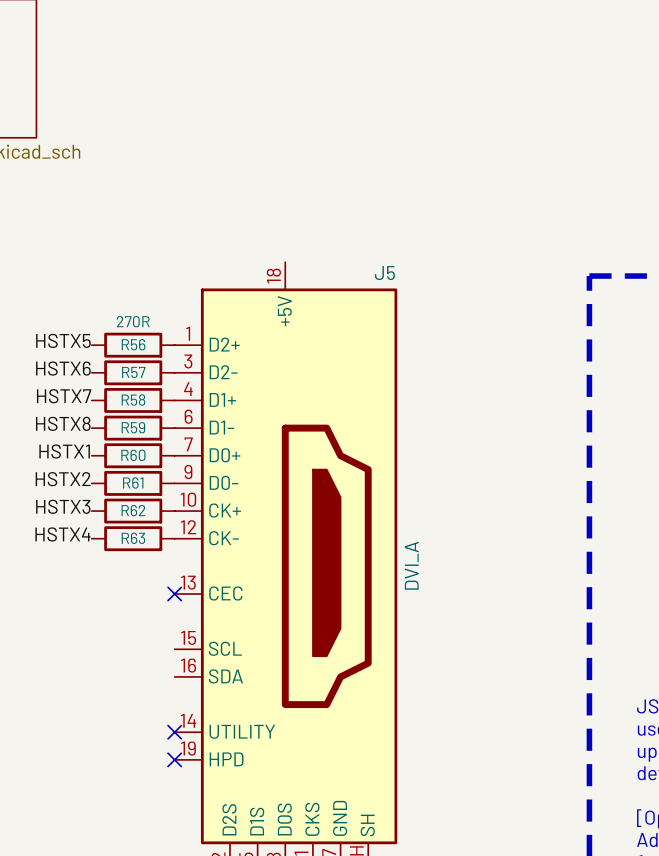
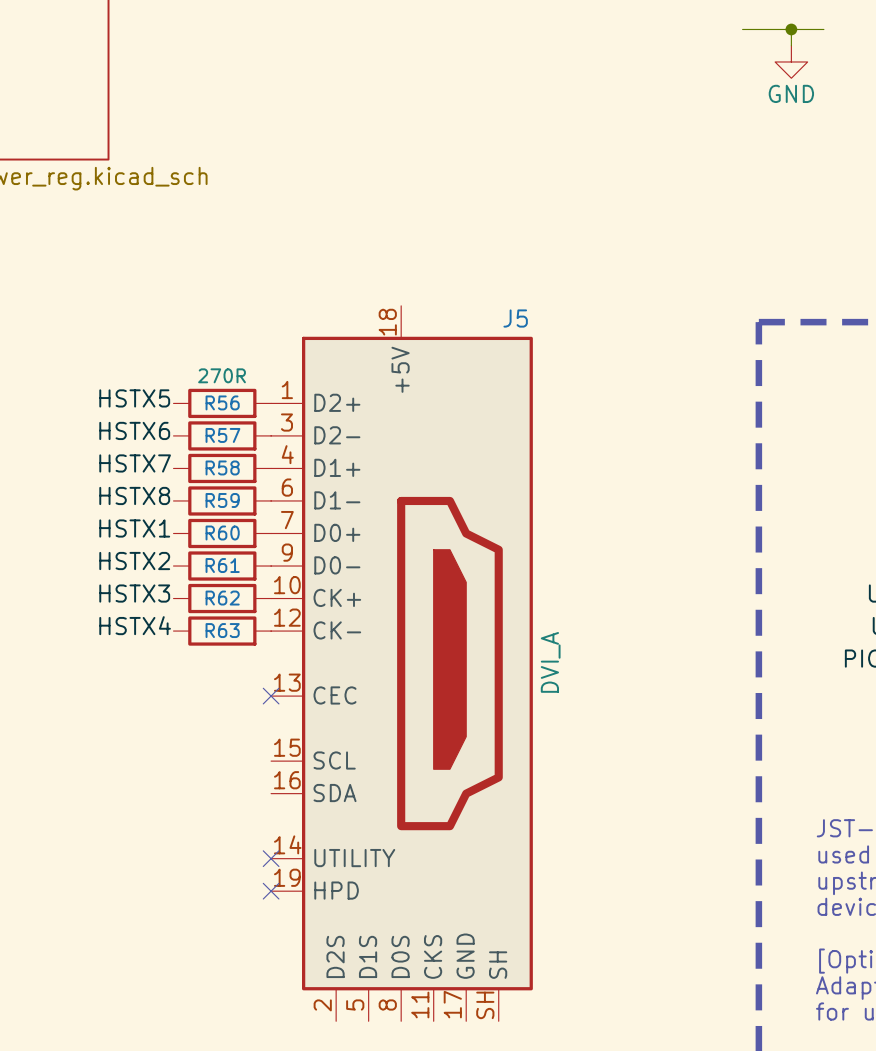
wire: none -> (742, 29) (823, 29)
wire: none -> (791, 29) (791, 45)
junction: none -> (791, 29)
power symbol: none -> GND (791, 61)

